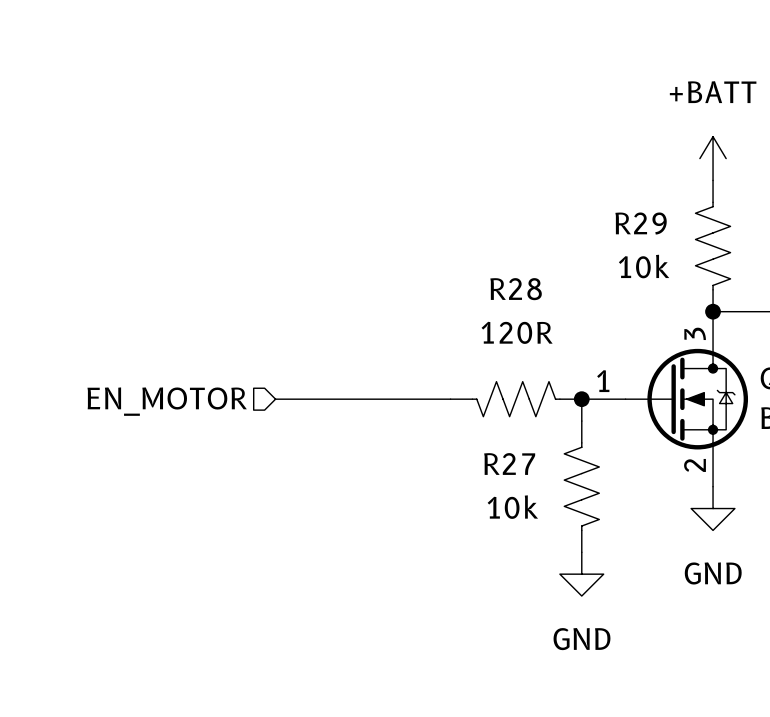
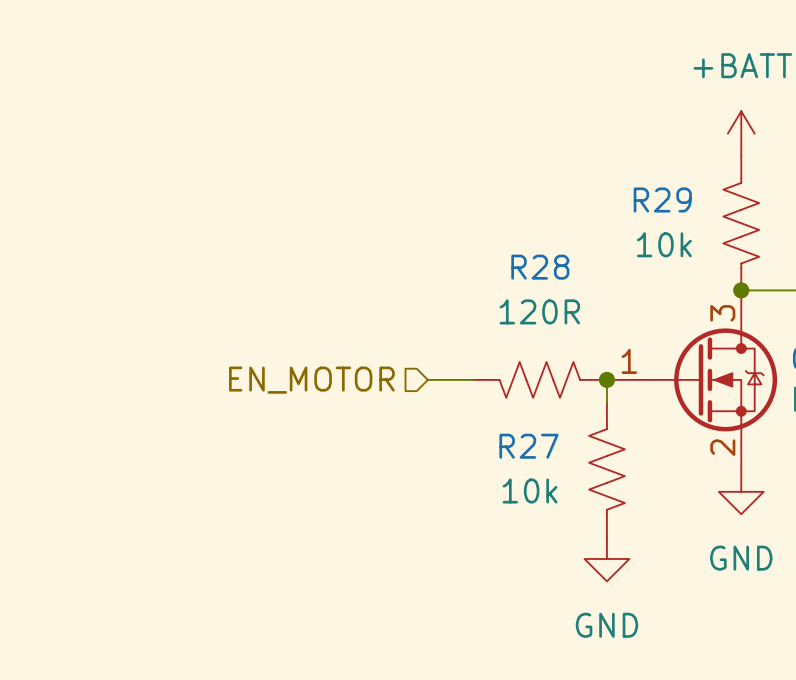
wire: (275, 399) (406, 399) -> none
hierarchical label position: EN_MOTOR (167, 401) -> EN_MOTOR (311, 380)

